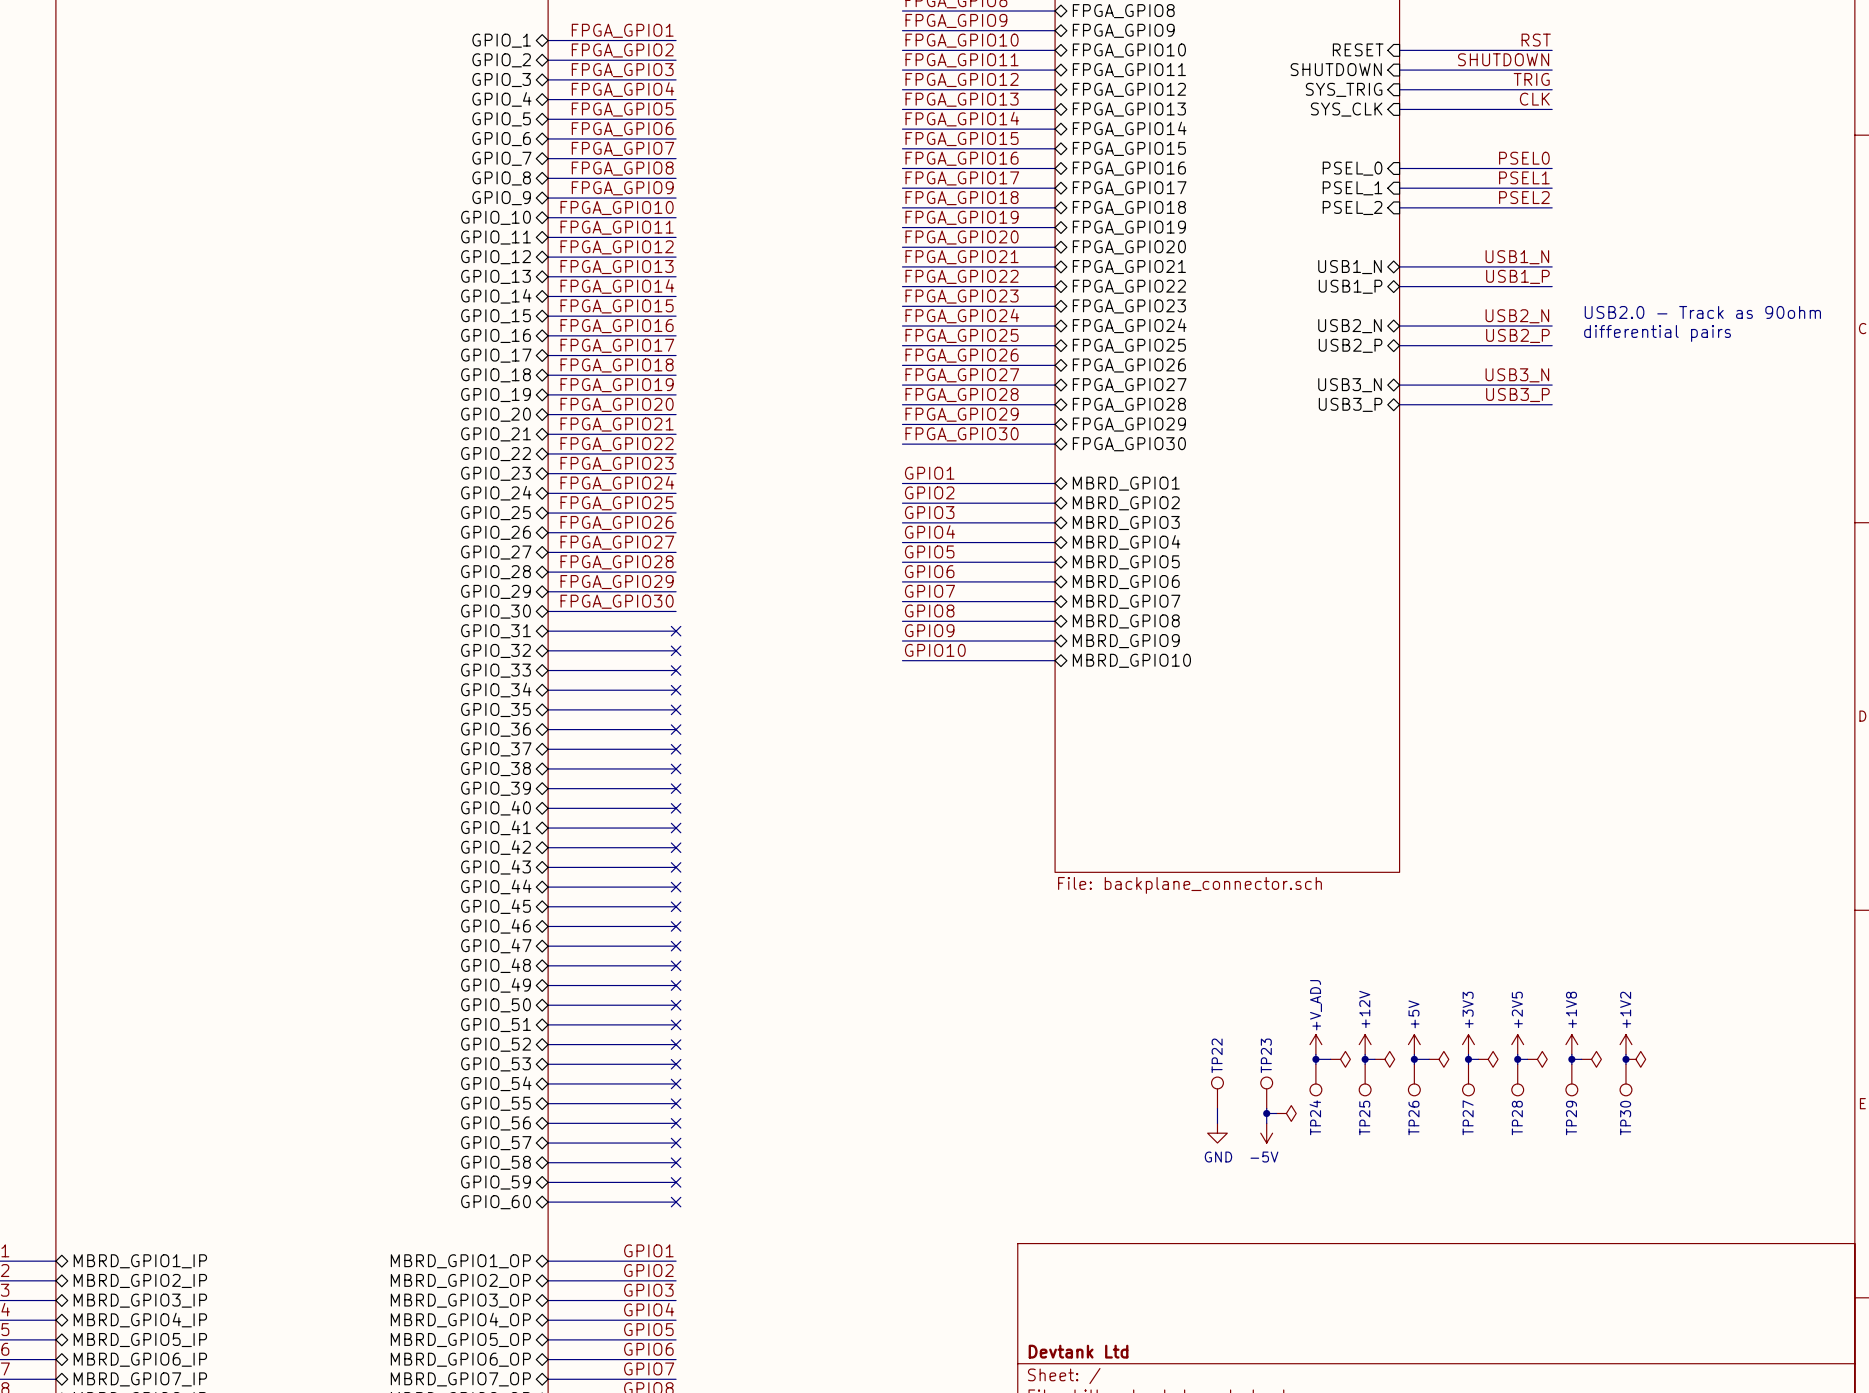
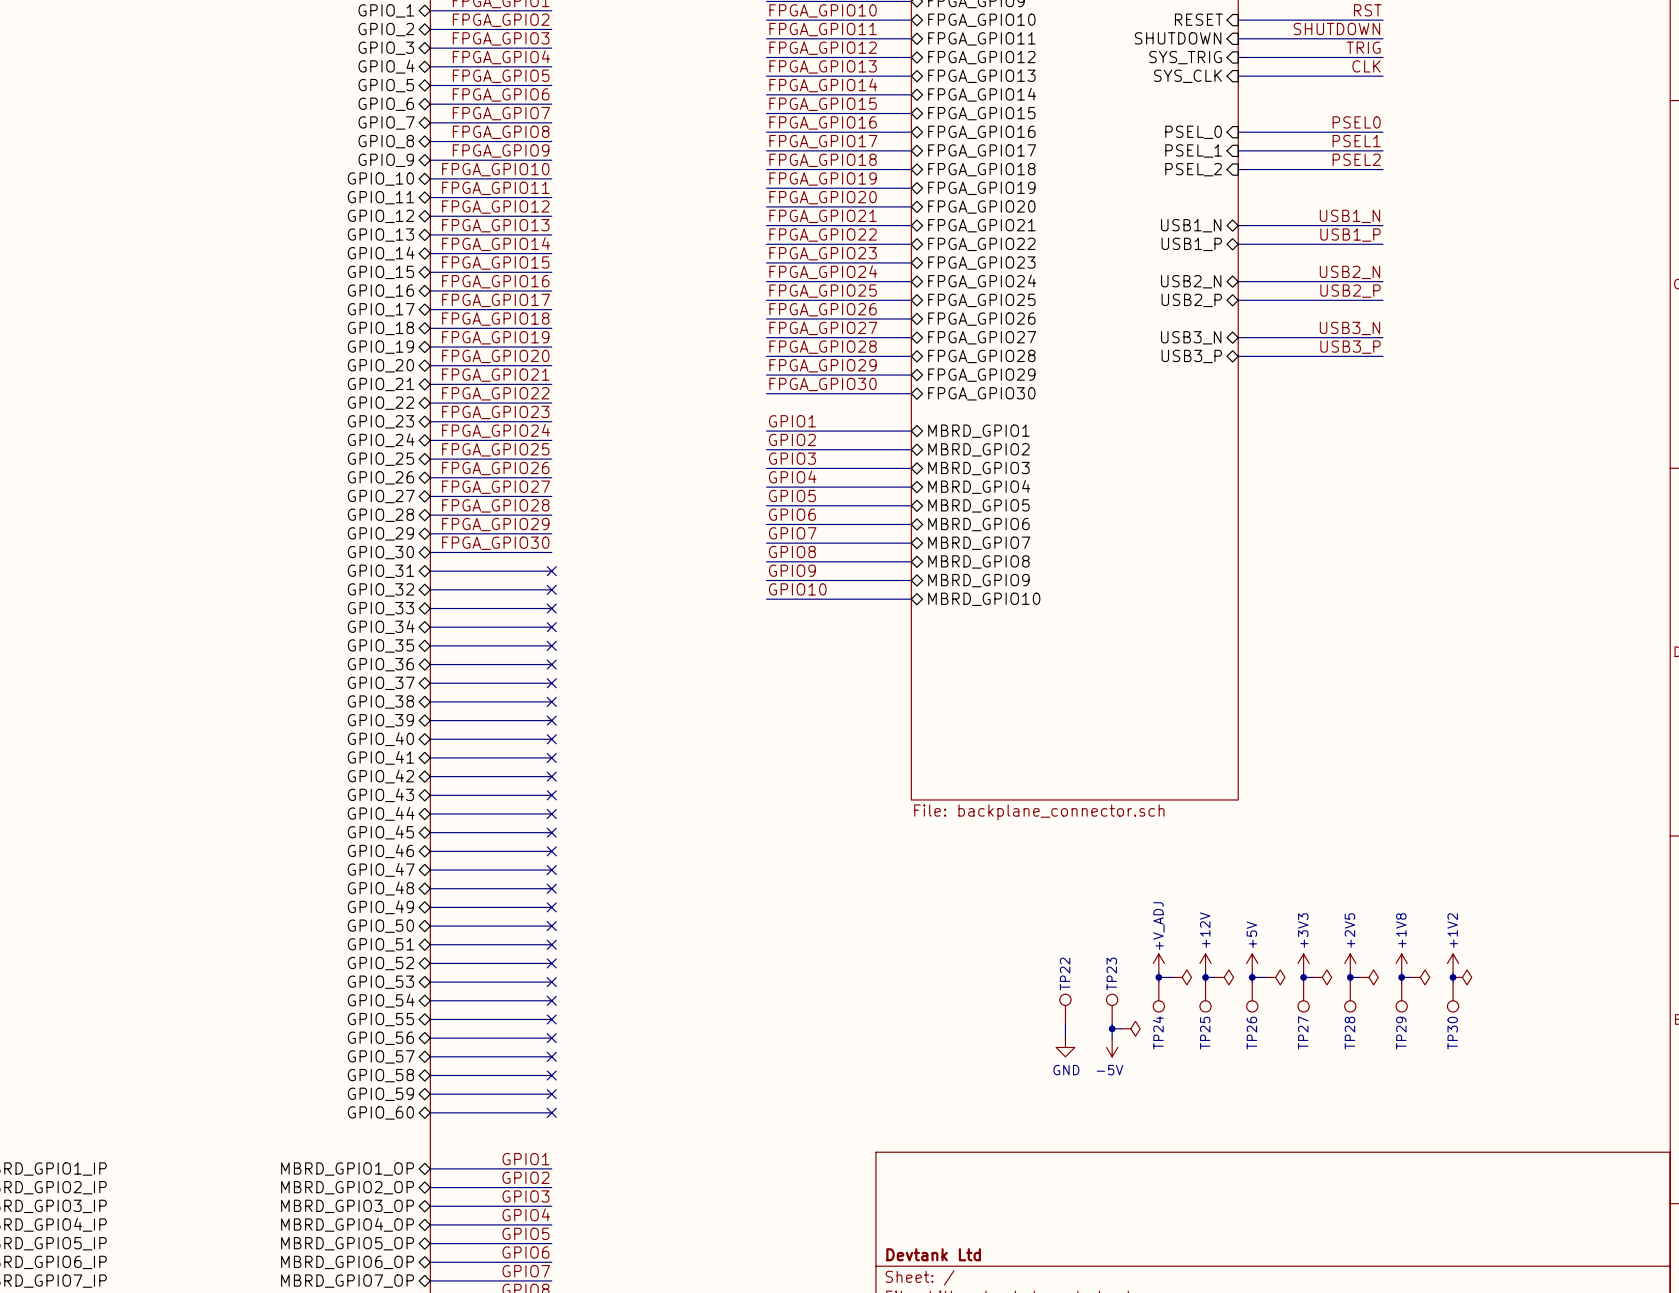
text: USB2.0 - Track as 90ohm (1702, 312) -> none
text: differential pairs (1657, 333) -> none

